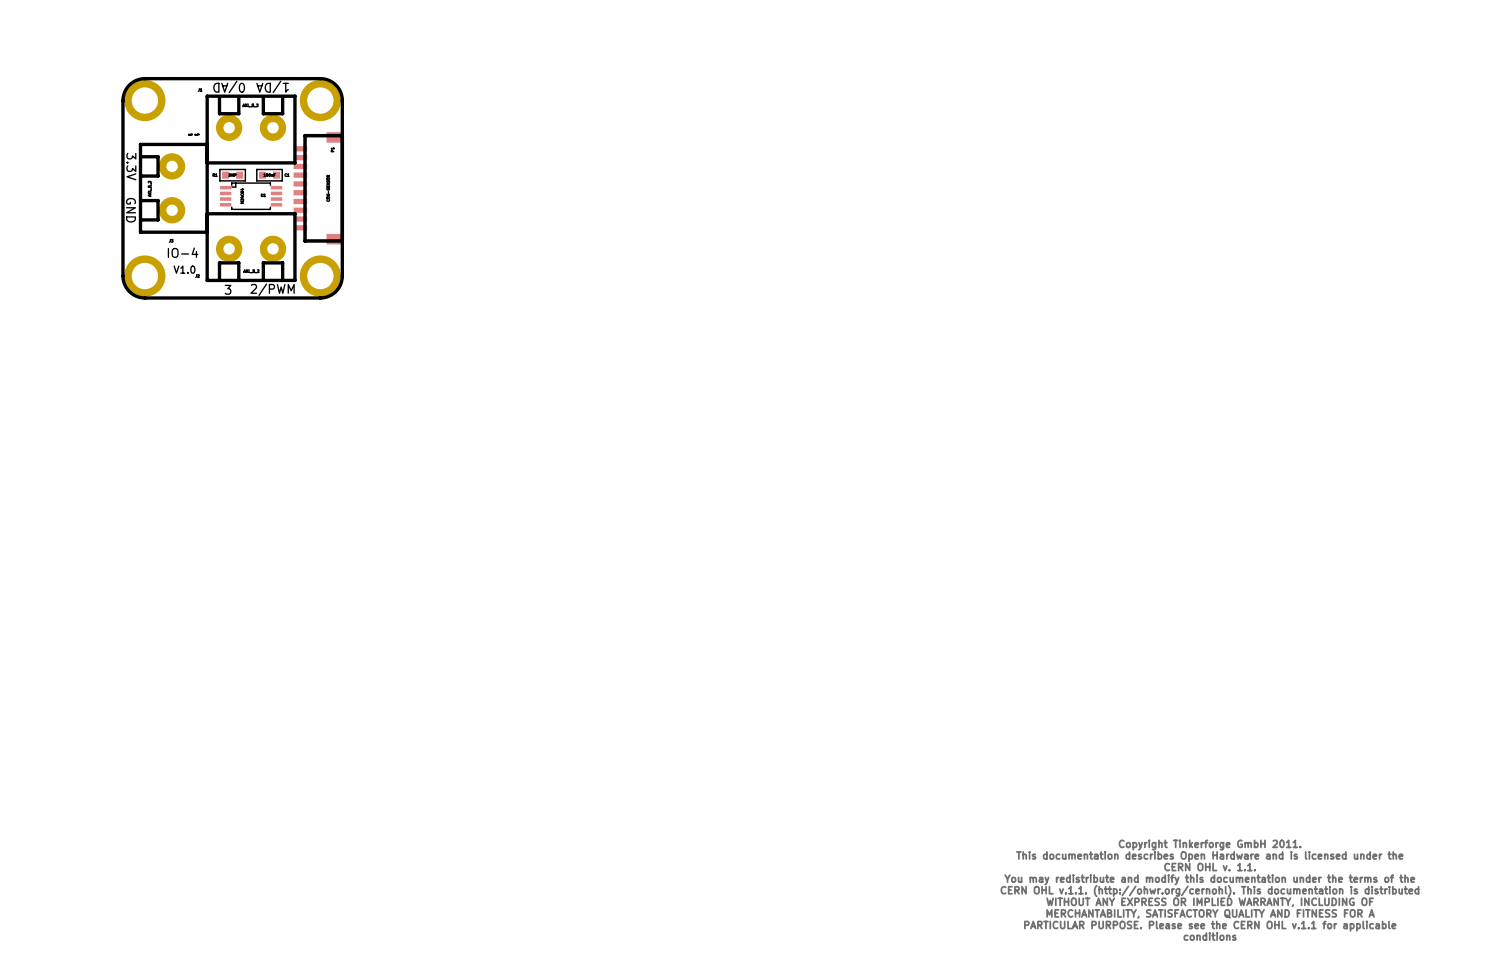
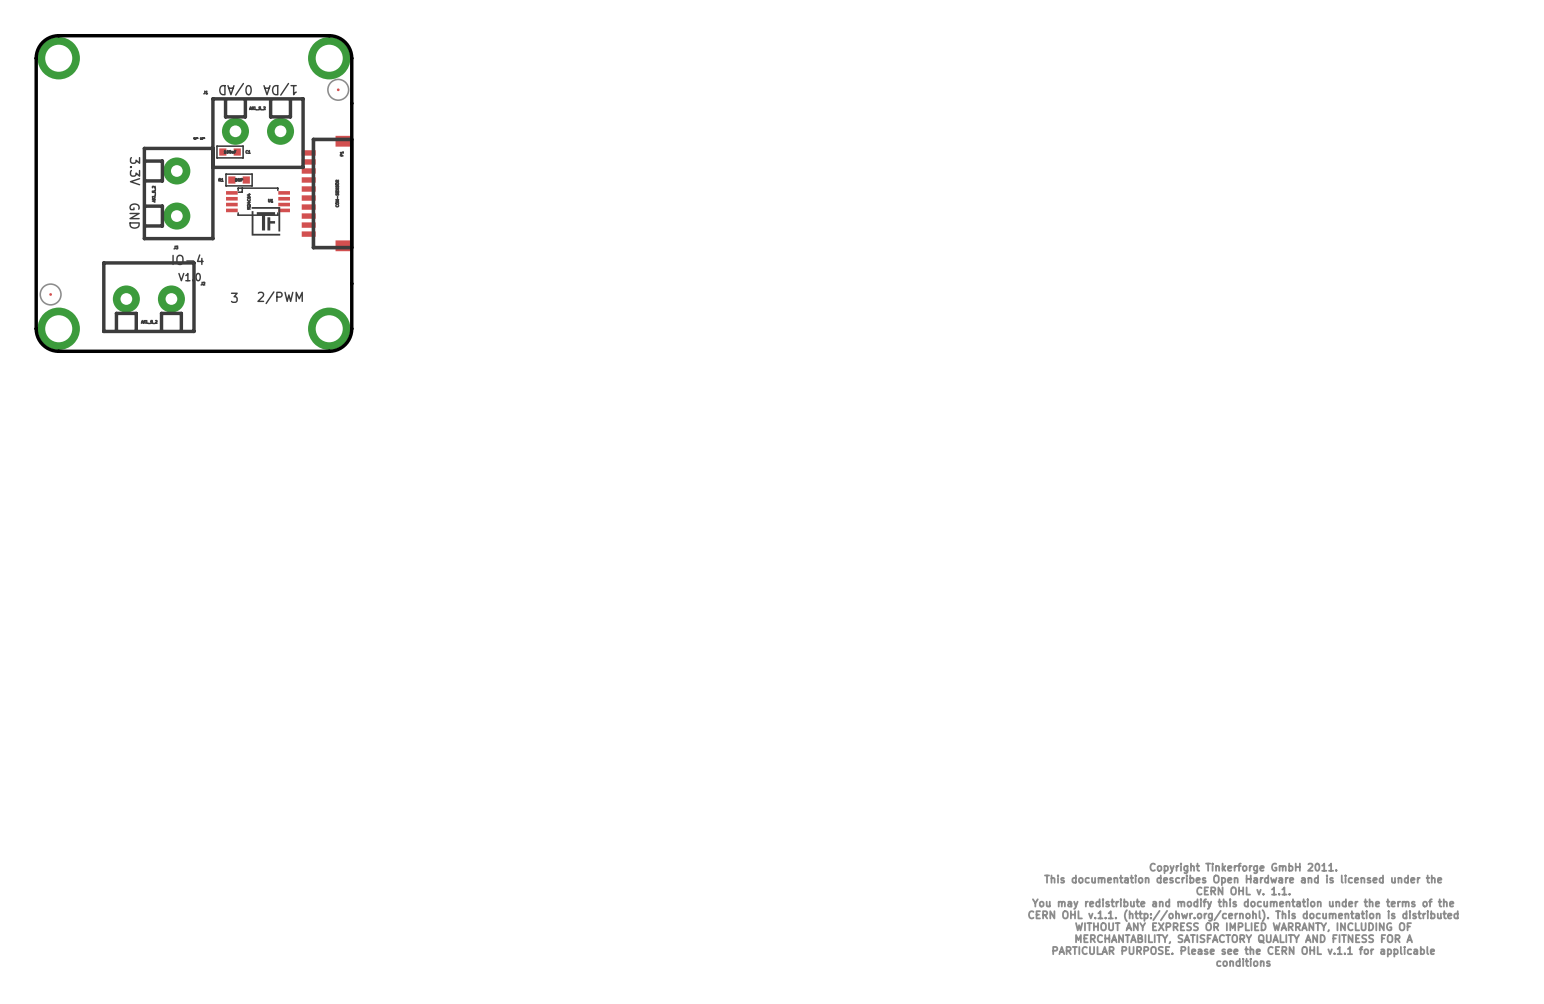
part: none -> (58, 58)
part: none -> (338, 89)
part: (144, 100) -> none
part position: (320, 100) -> (329, 58)
board edge: (342, 100) (340, 92) (335, 85) (328, 80) (320, 78) (142, 78) (133, 81) (127, 87) (122, 100) (122, 276) (124, 284) (131, 293) (144, 297) (323, 297) (331, 295) (337, 289) (342, 276) -> (351, 103) (350, 52) (345, 42) (332, 35) (55, 35) (42, 42) (36, 55) (36, 328) (37, 337) (45, 346) (58, 351) (335, 350) (345, 344) (350, 334) (351, 283)
part position: (269, 175) -> (230, 152)
drawing: none -> [251, 207, 281, 236]
part position: (251, 247) -> (148, 297)
part: (144, 276) -> none
part position: (320, 276) -> (329, 328)
part: none -> (50, 294)
part: none -> (58, 328)

